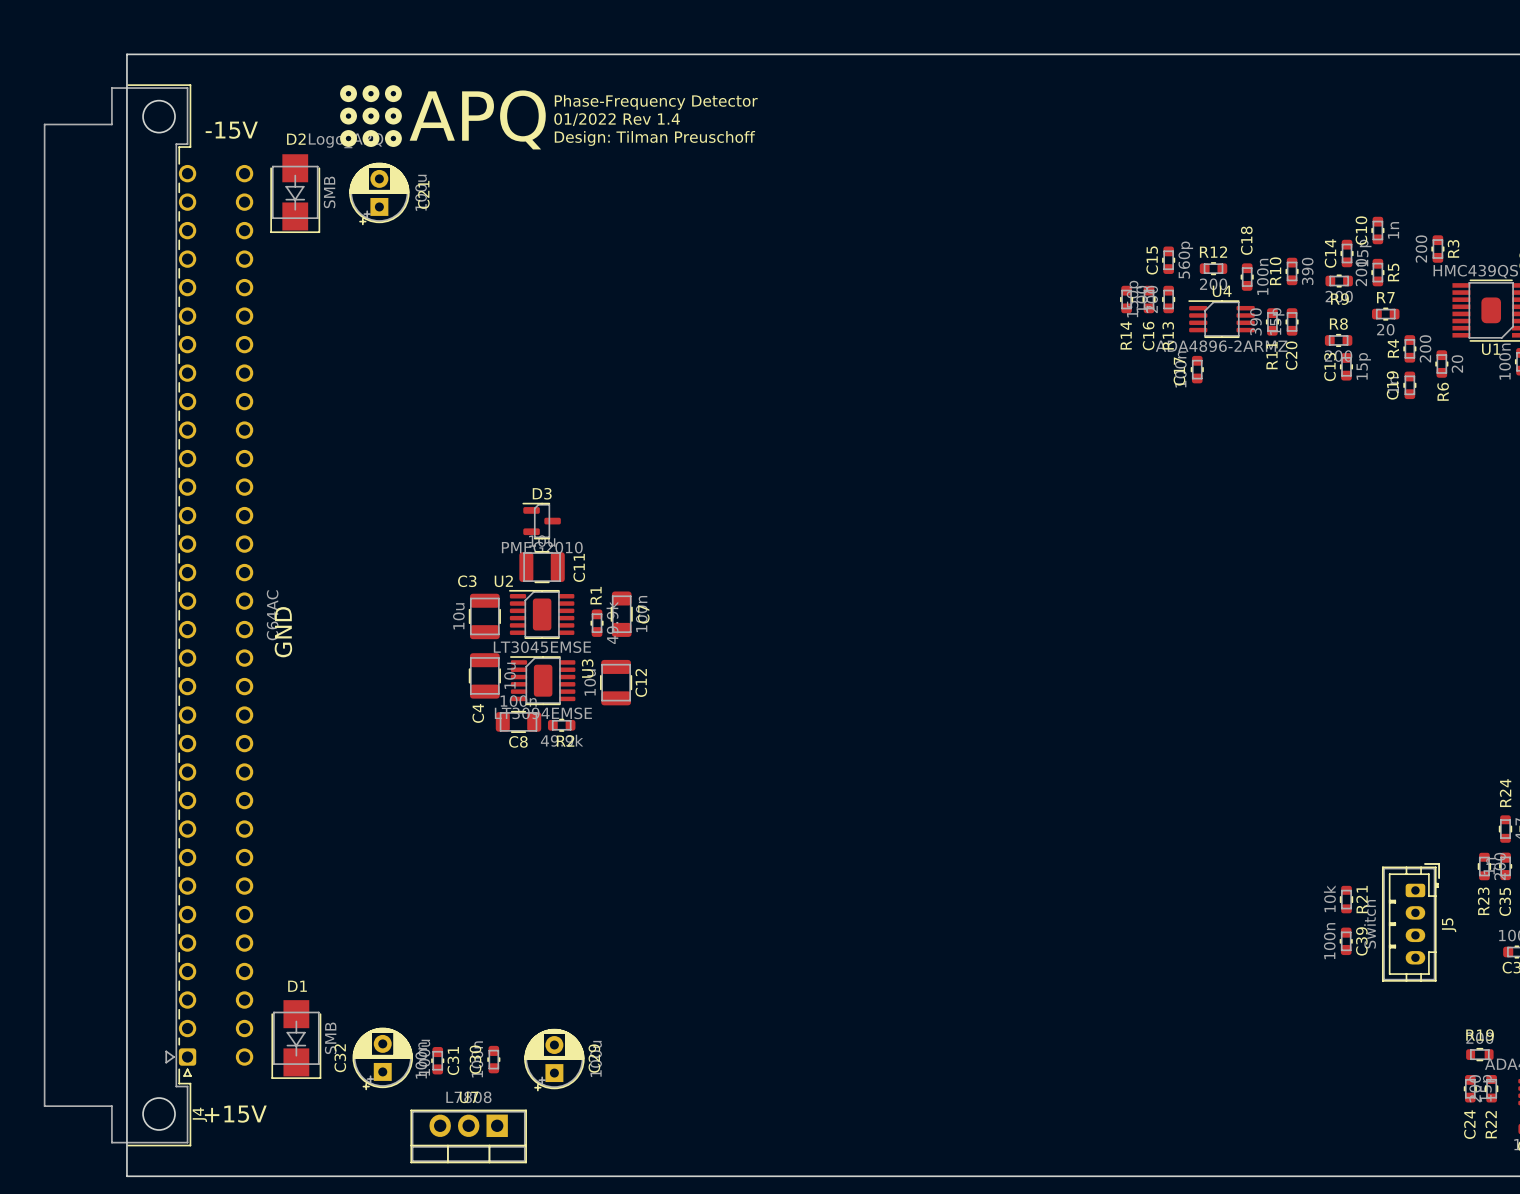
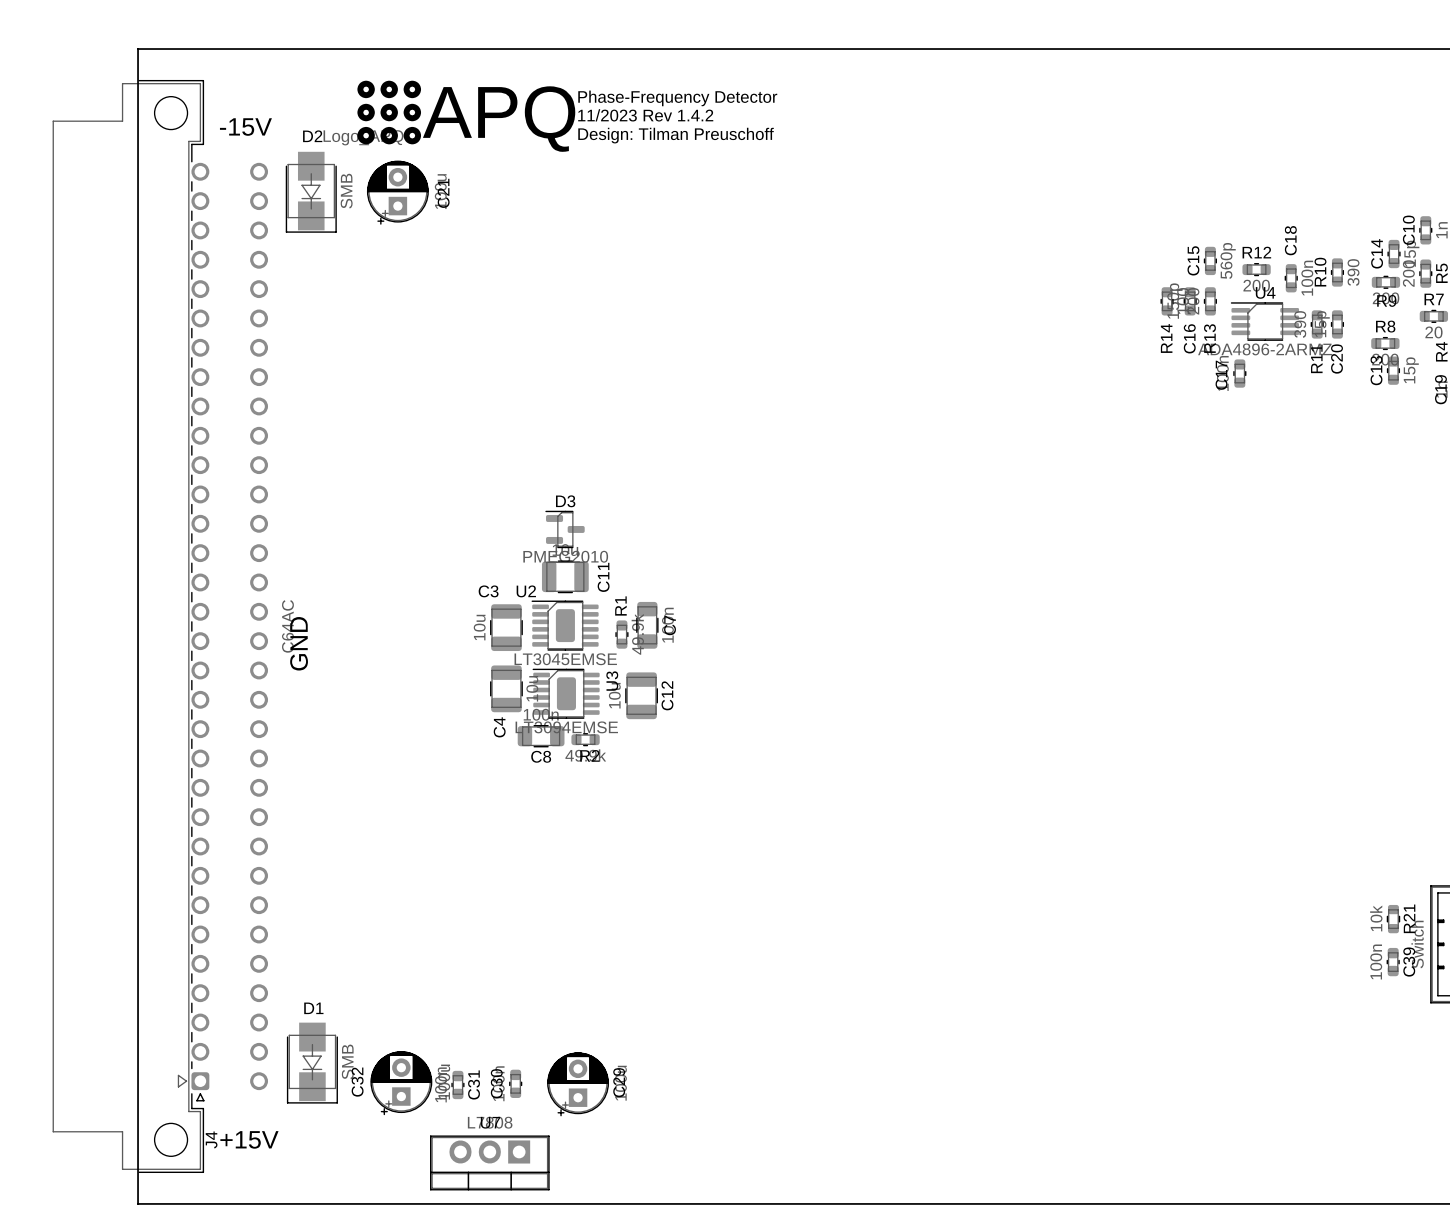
text: 01/2022 Rev 1.4 (617, 119) -> 11/2023 Rev 1.4.2 (645, 115)

